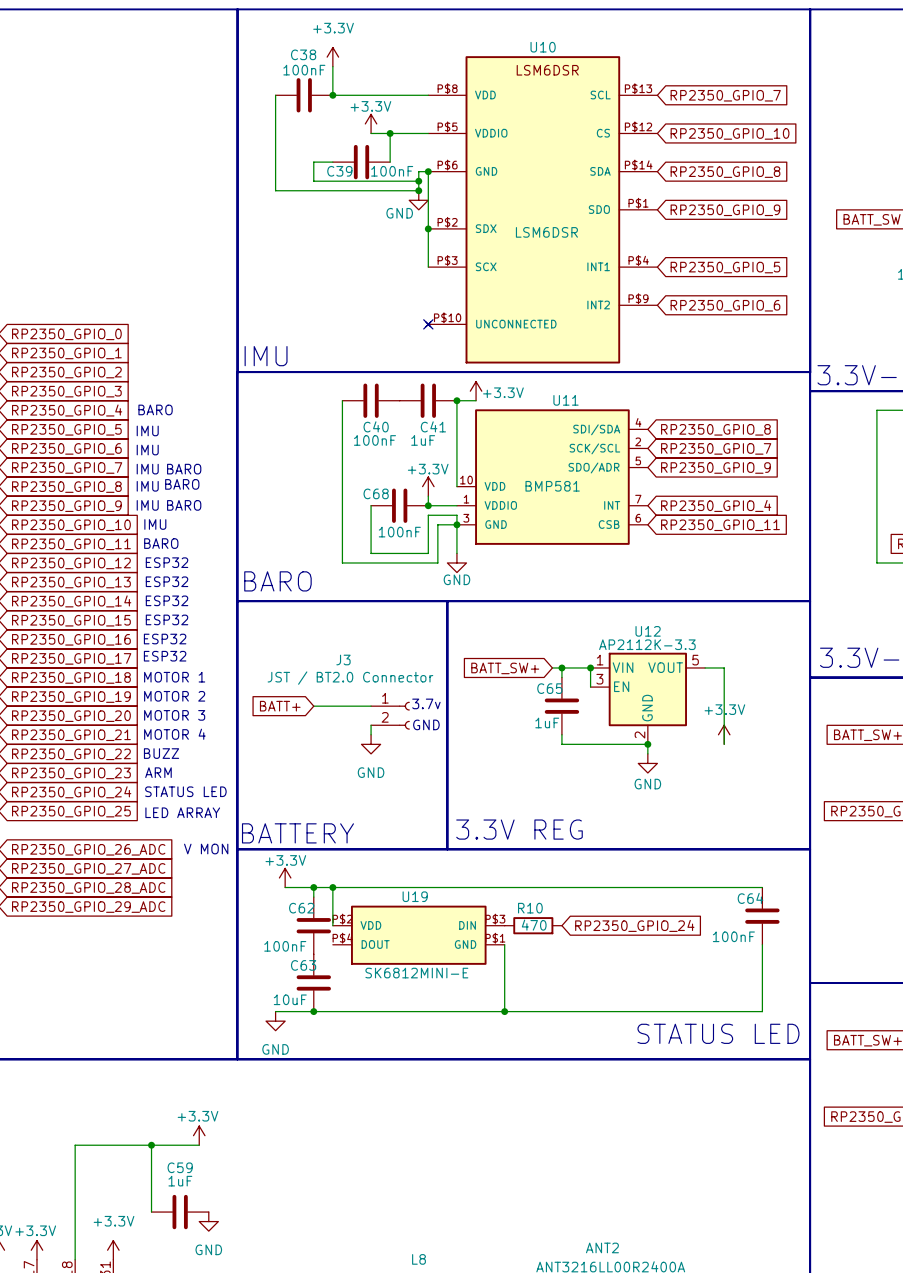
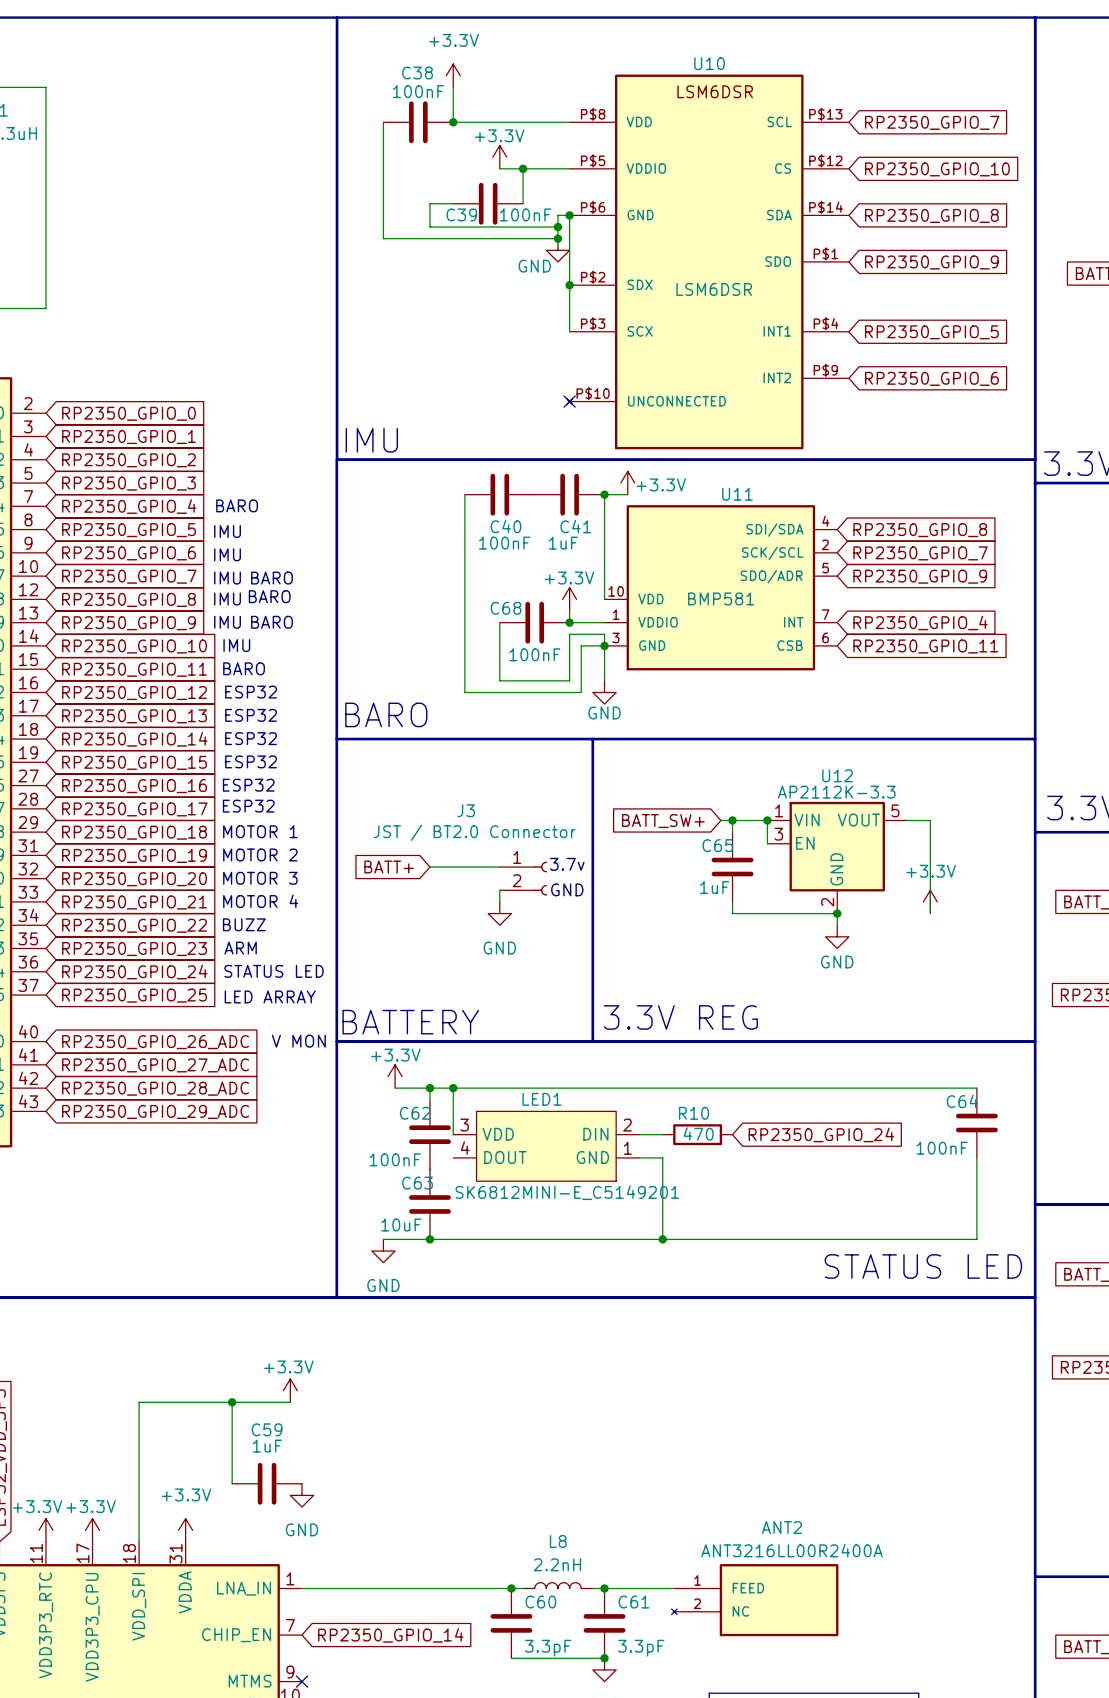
LED1: none -> SK6812MINI-E_C5149201 (546, 1146)
U19: SK6812MINI-E (418, 935) -> none

